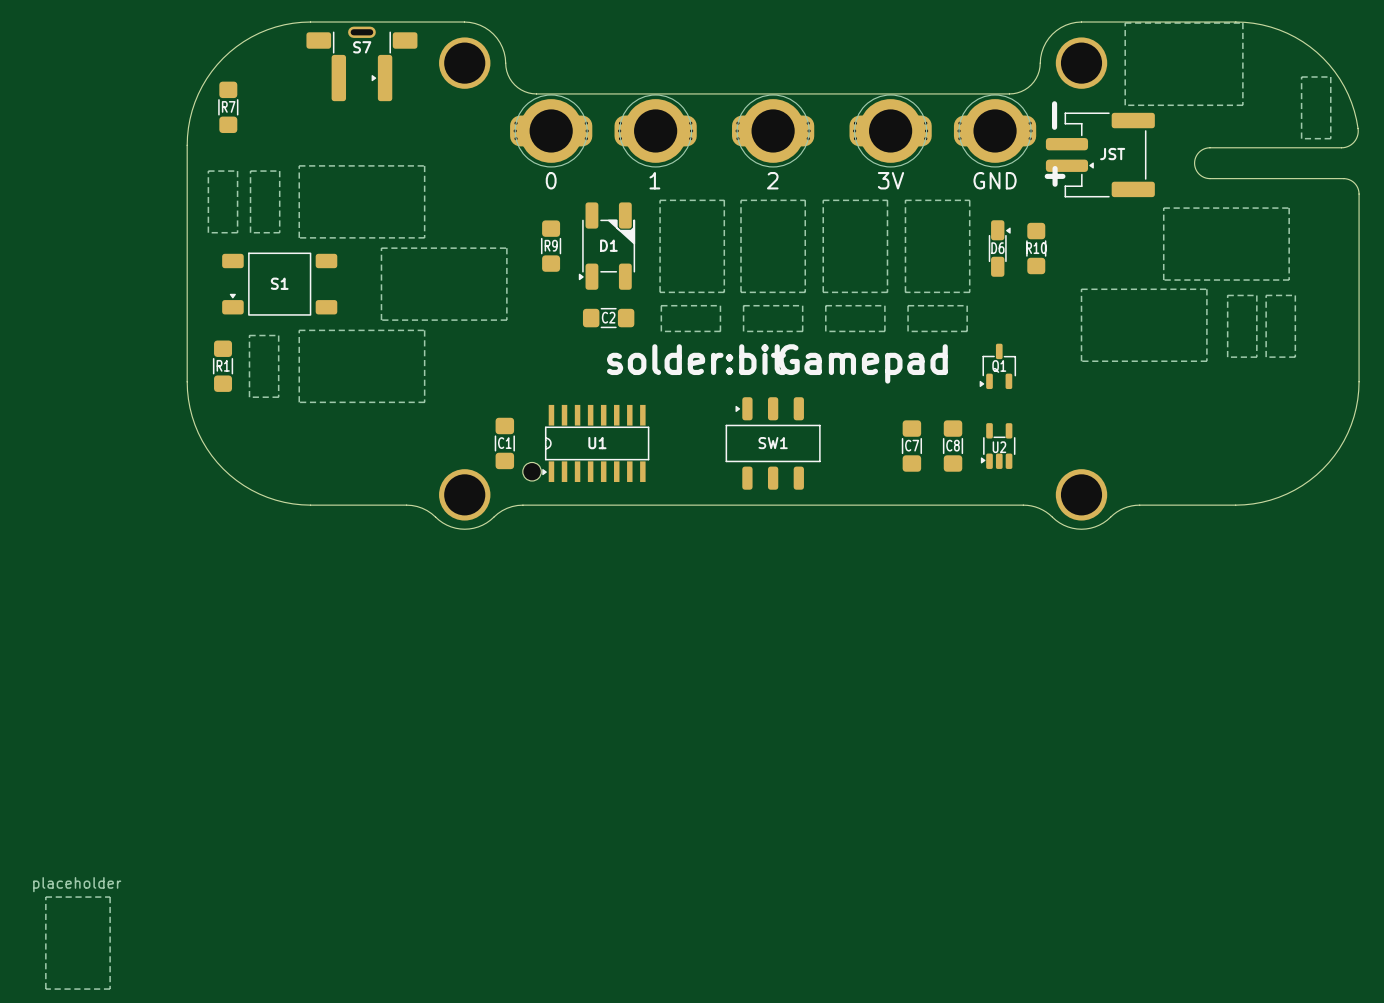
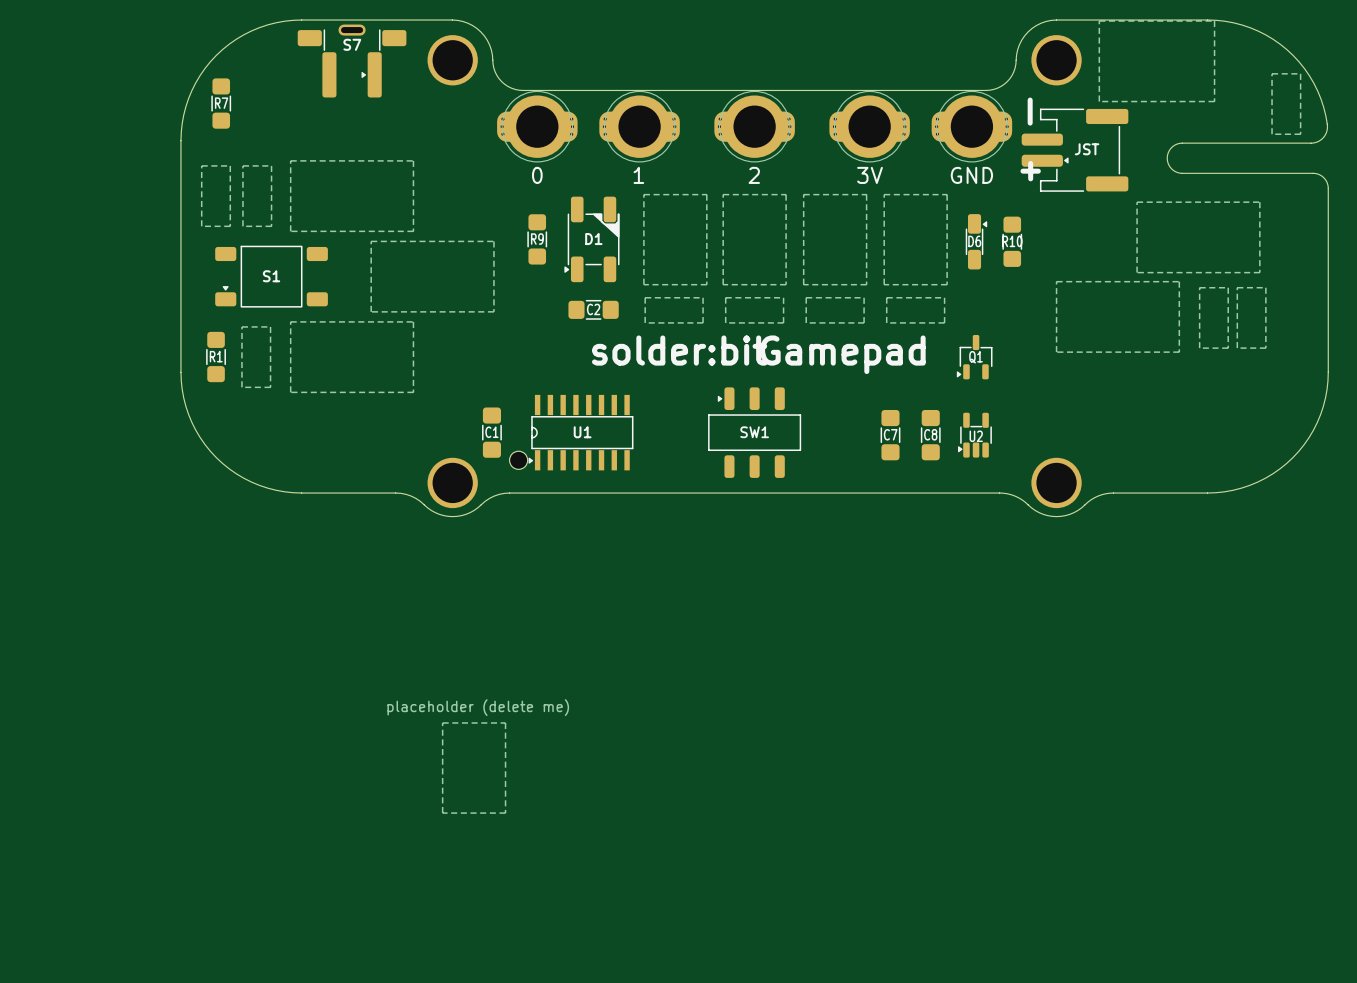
text: none -> placeholder (delete me) (478, 707)
line: none -> (442, 722) (505, 722) (505, 813) (442, 813) (442, 722)
text: placeholder (77, 884) -> none
line: (45, 897) (110, 897) (110, 989) (45, 989) (45, 897) -> none

